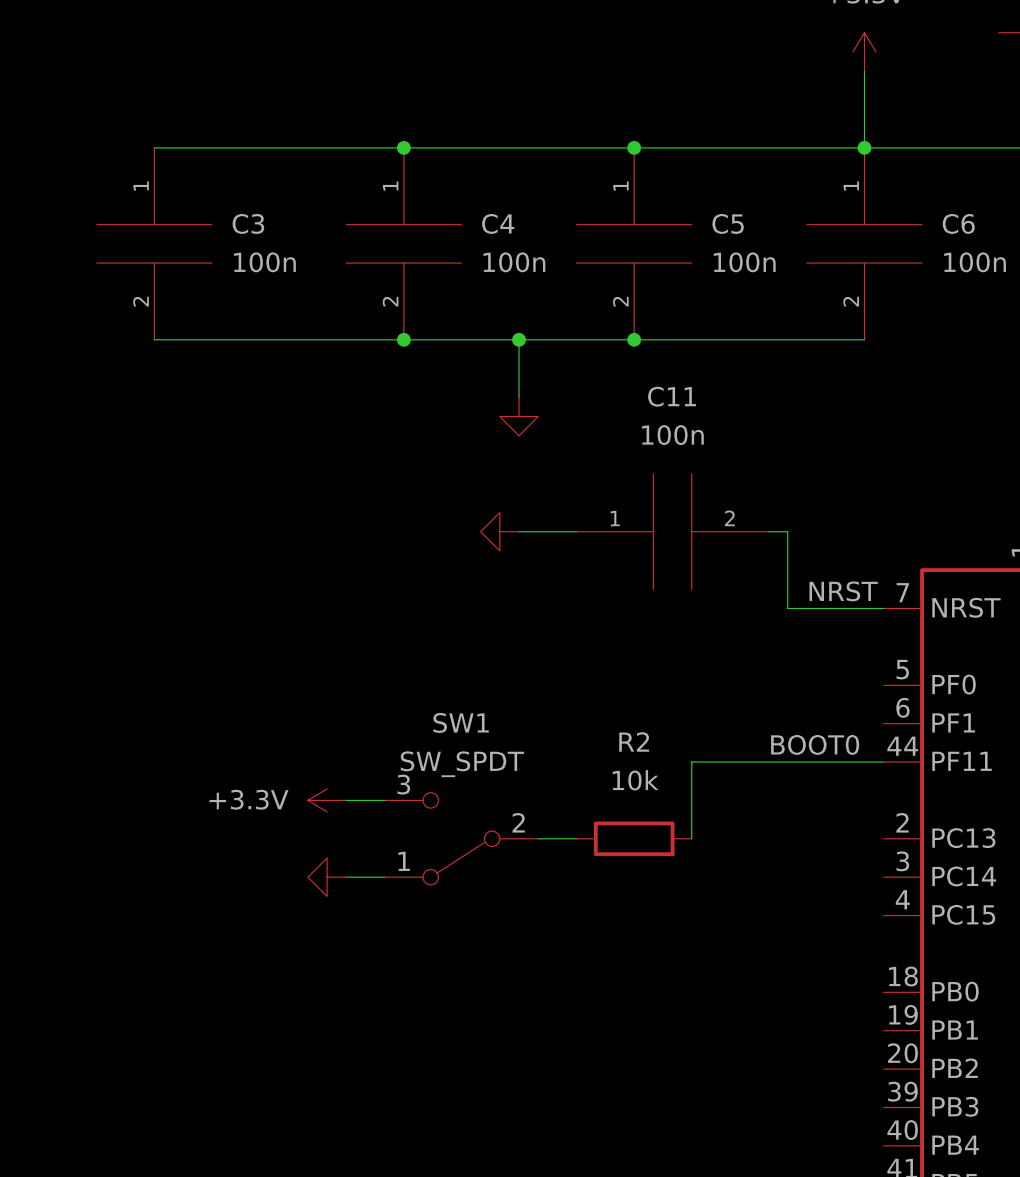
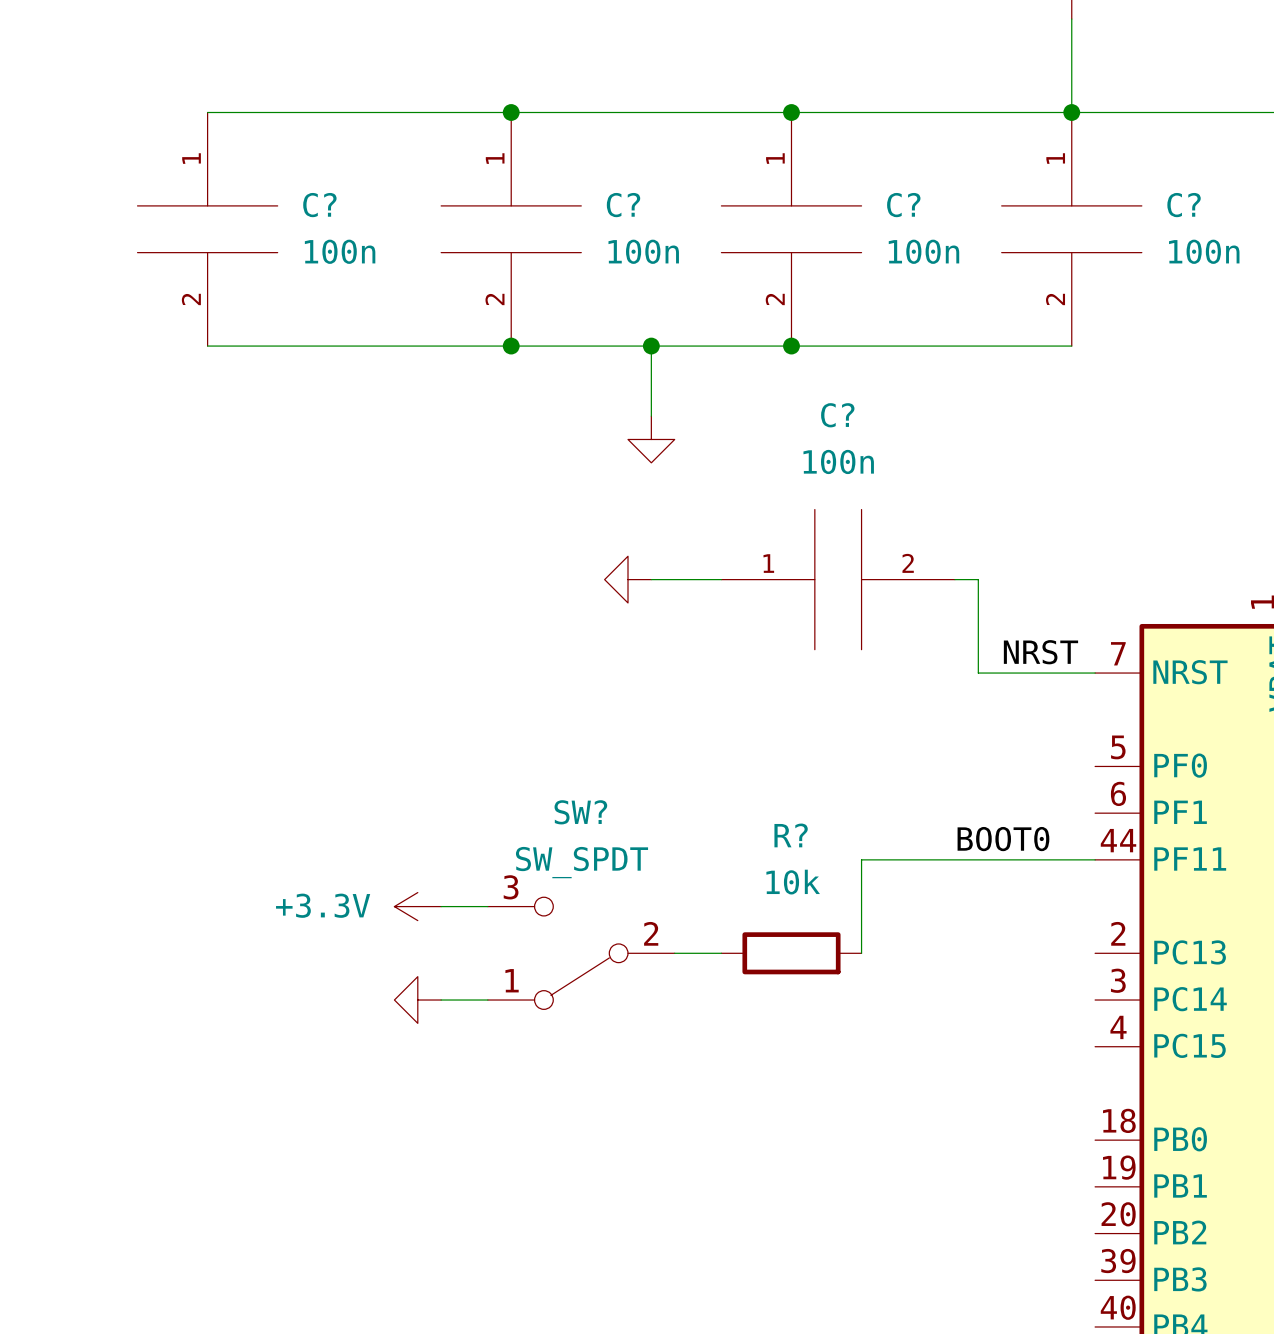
C3 name: C3 (248, 223) -> C? (319, 205)
C4 name: C4 (498, 223) -> C? (623, 205)
C5 name: C5 (728, 223) -> C? (903, 205)
C6 name: C6 (958, 223) -> C? (1184, 205)
C11 name: C11 (672, 396) -> C? (837, 415)
SW1 name: SW1 (461, 722) -> SW? (580, 812)
R2 name: R2 (634, 741) -> R? (791, 835)

